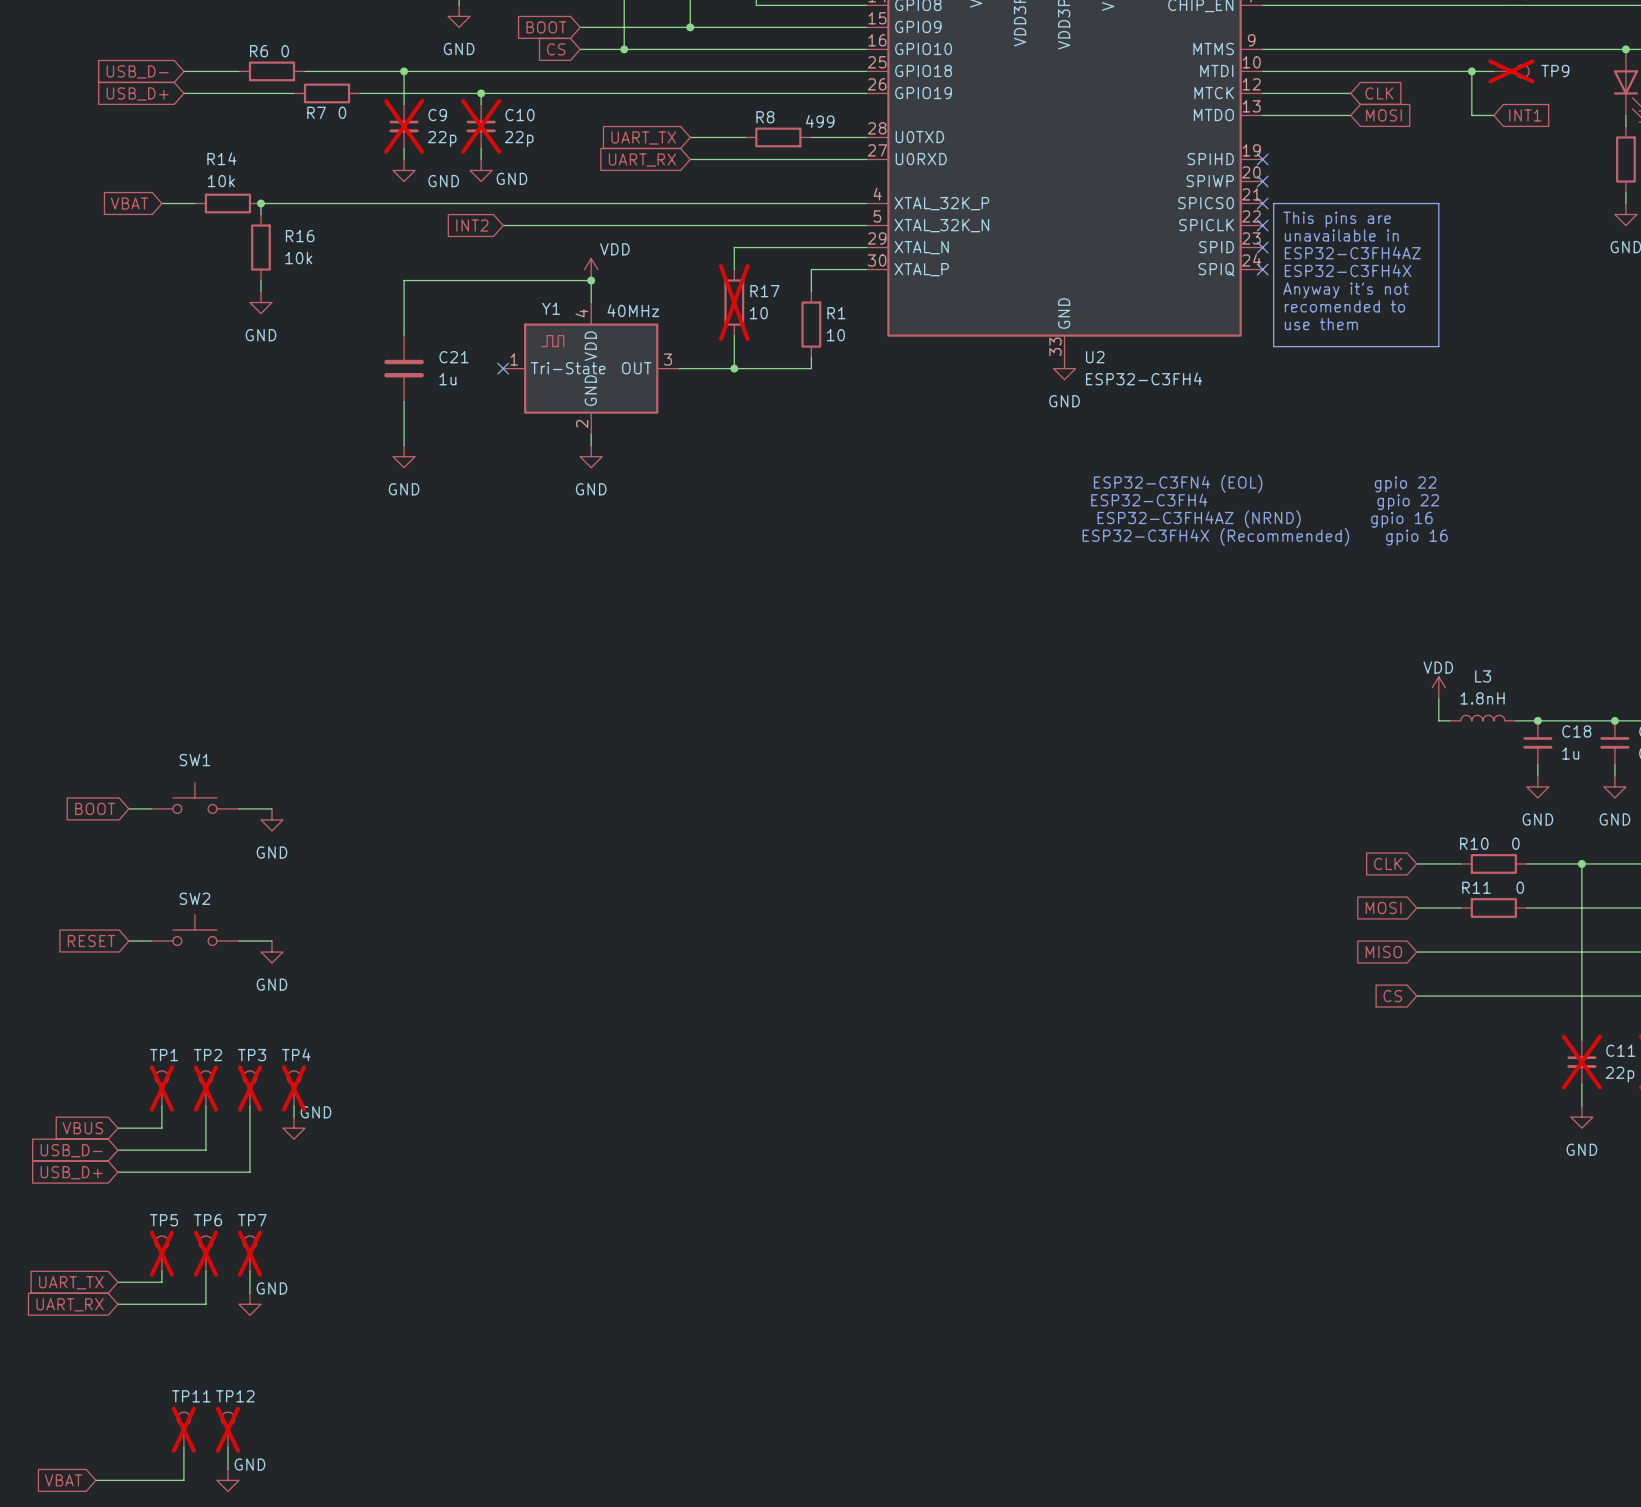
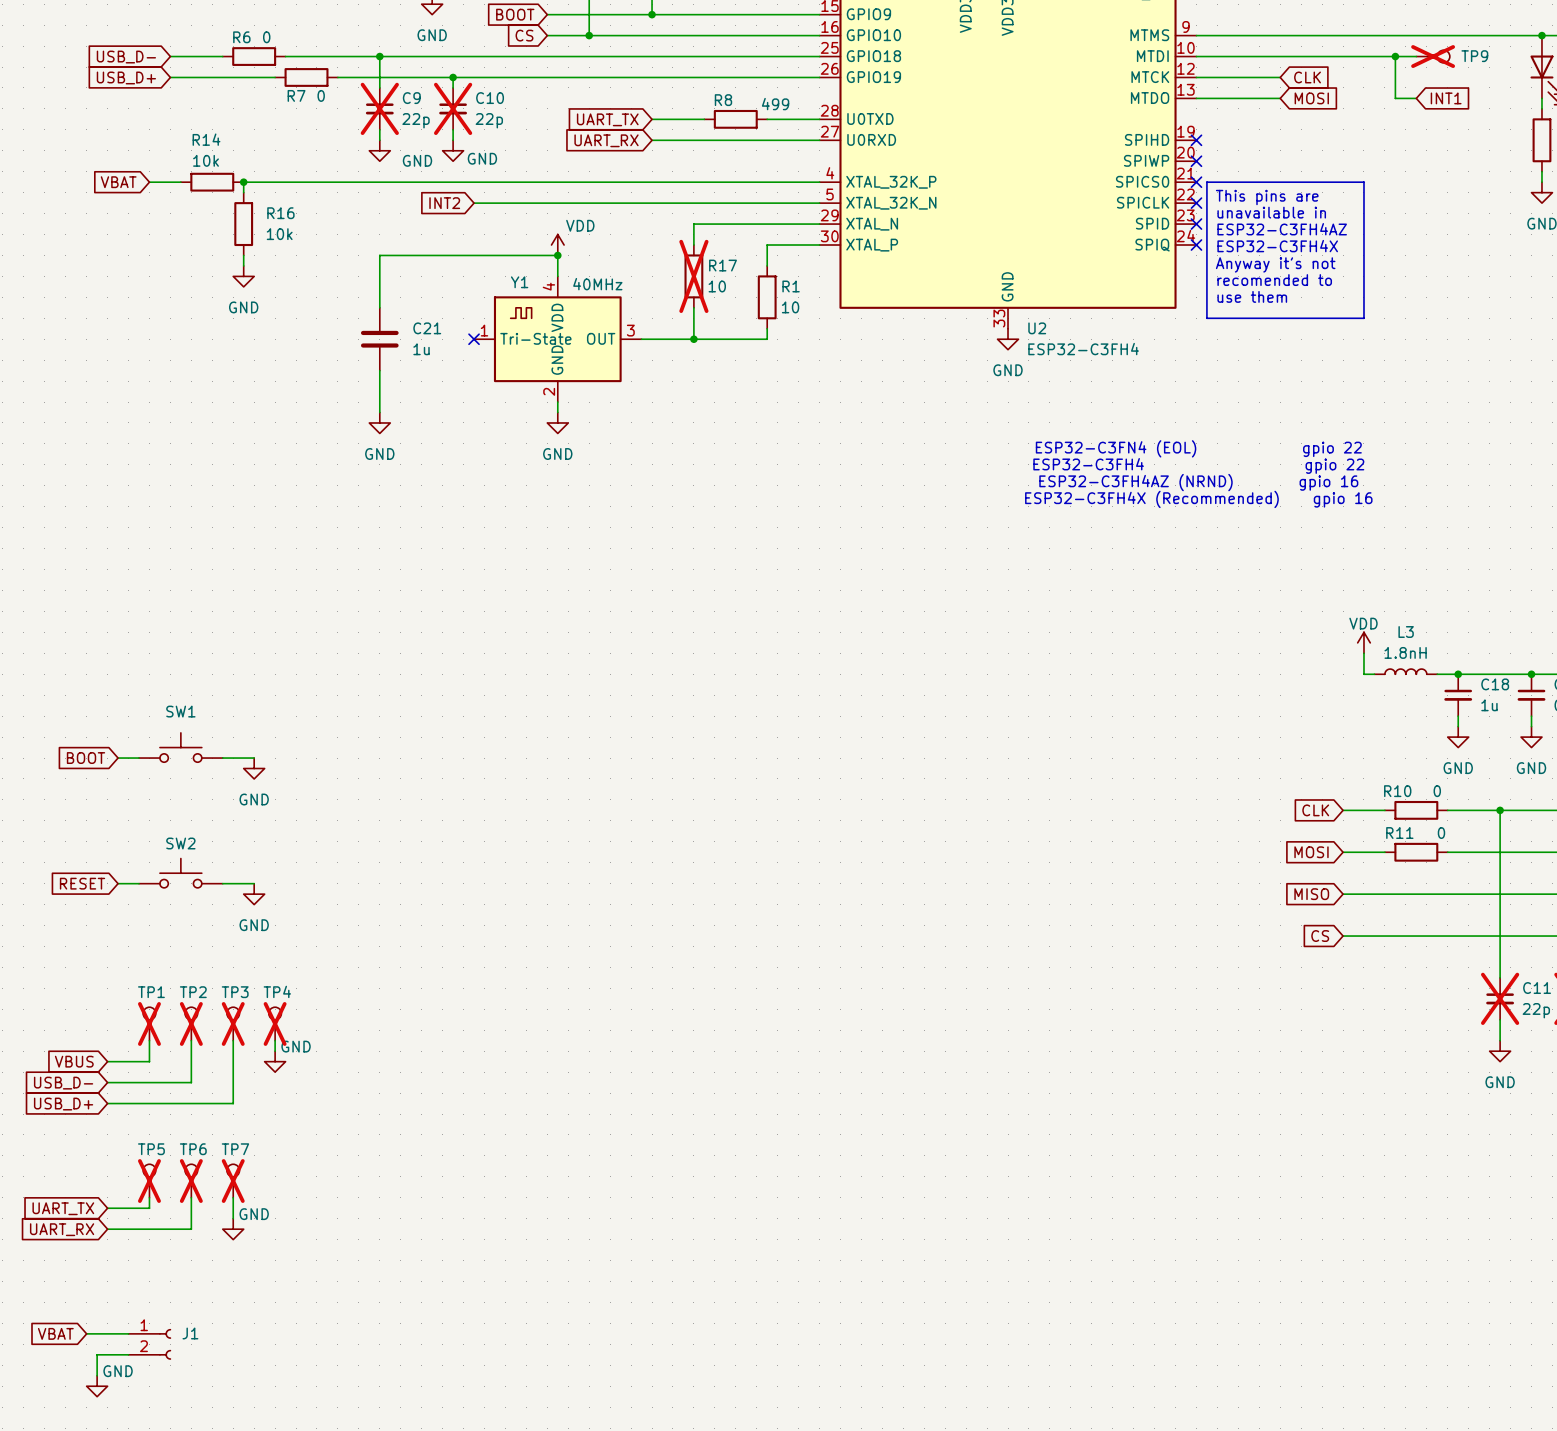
wire: none -> (86, 1333) (128, 1333)
J1: none -> (149, 1344)
TP11: (183, 1429) -> none
TP12: (227, 1429) -> none
wire: none -> (128, 1354) (97, 1354) (97, 1375)
wire: (183, 1447) (183, 1480) (95, 1480) -> none
wire: (227, 1447) (227, 1469) -> none
global label position: VBAT (63, 1480) -> VBAT (55, 1333)
power symbol position: GND (227, 1480) -> GND (97, 1386)

